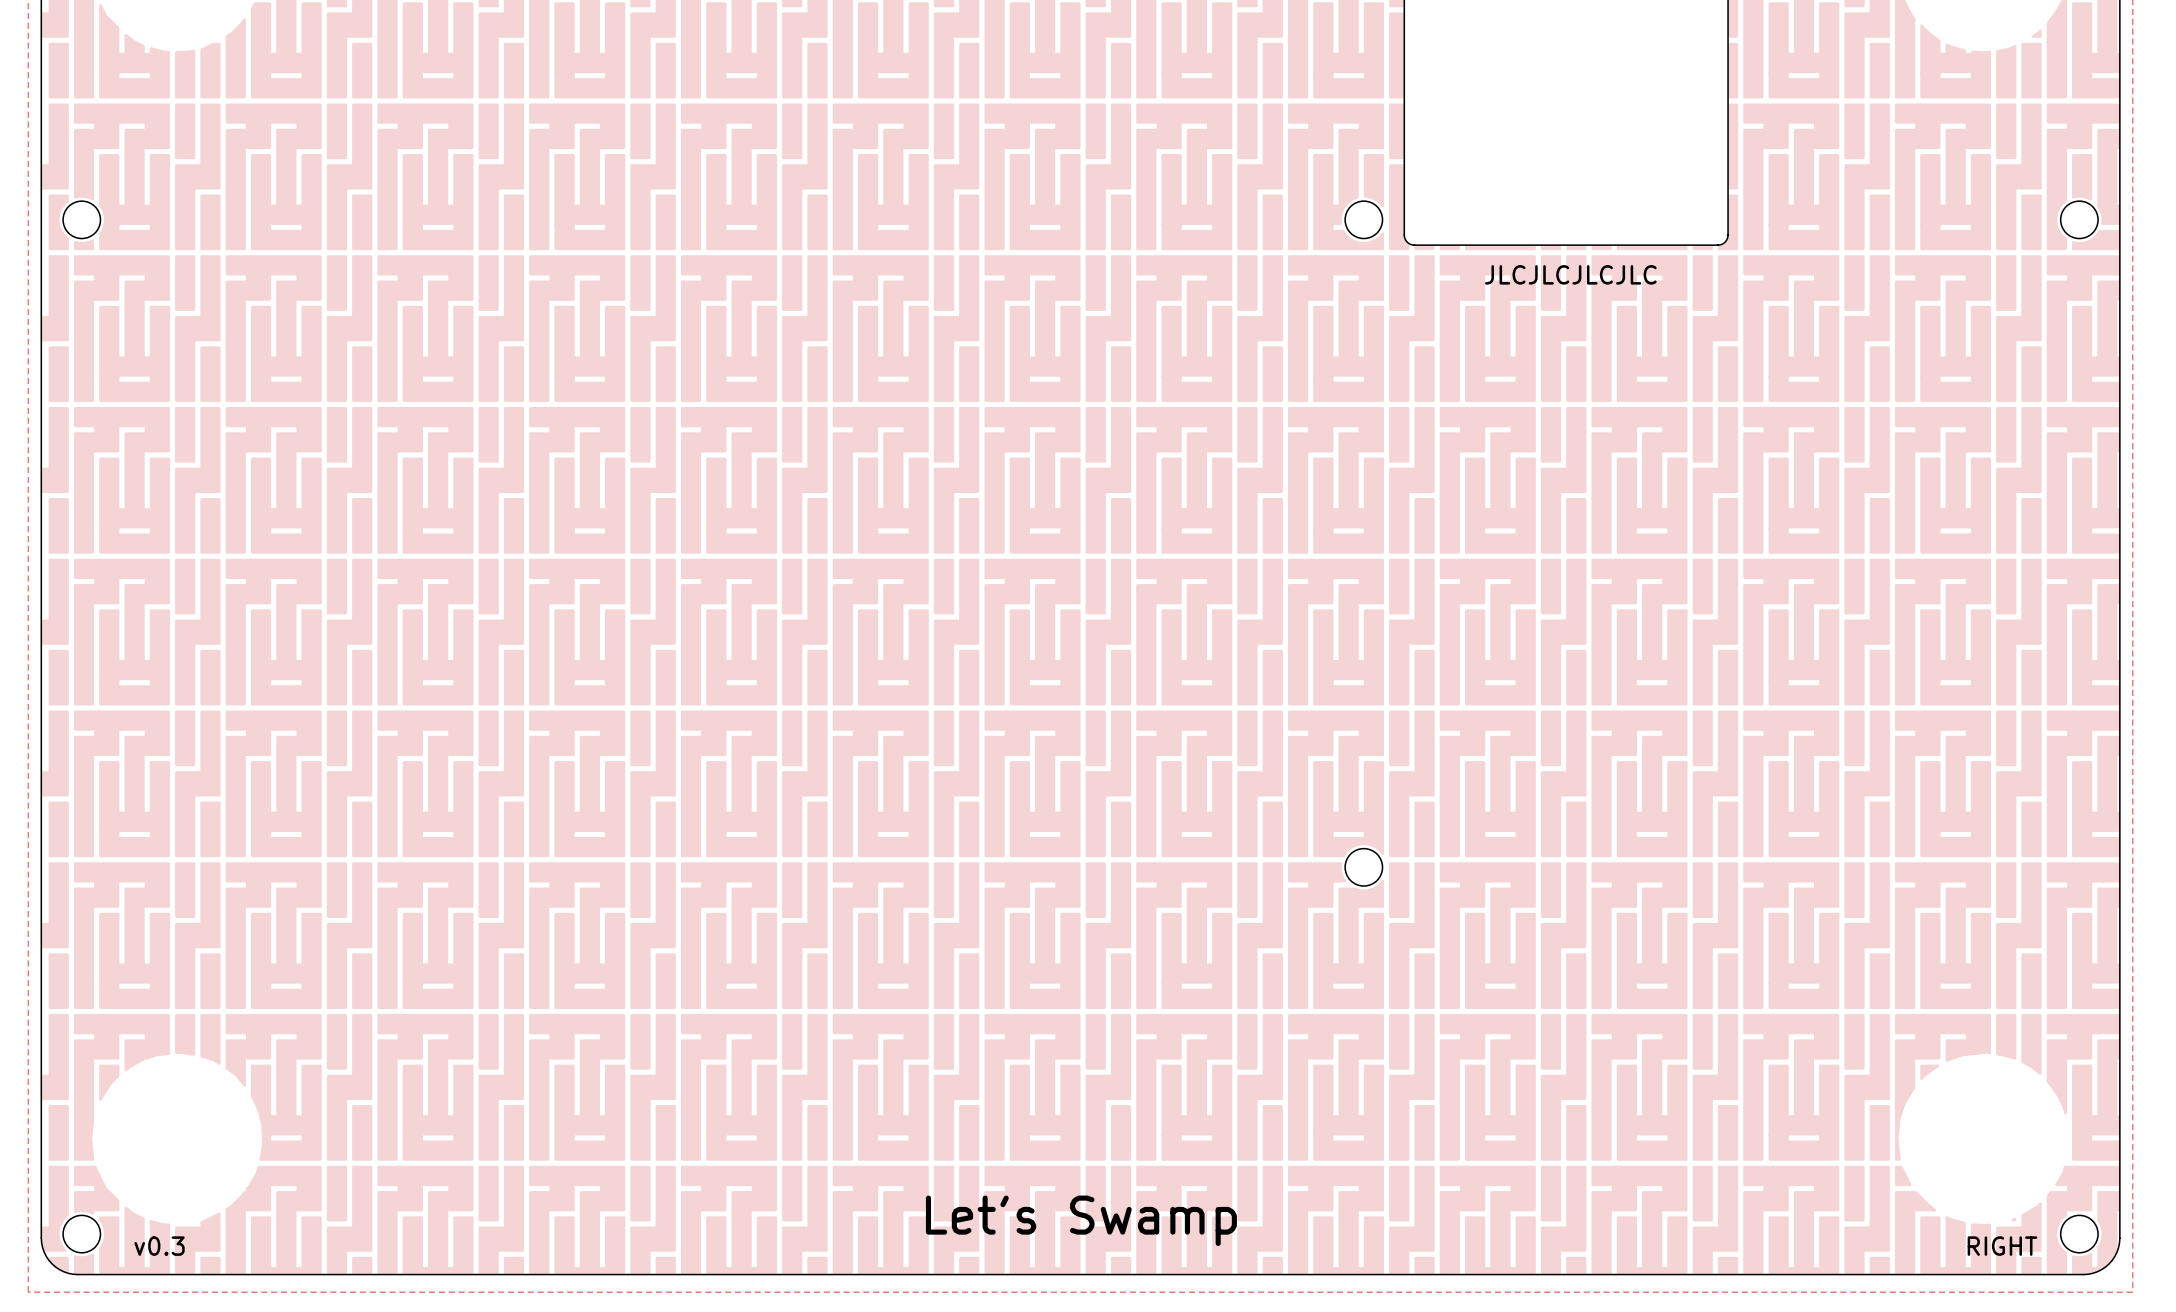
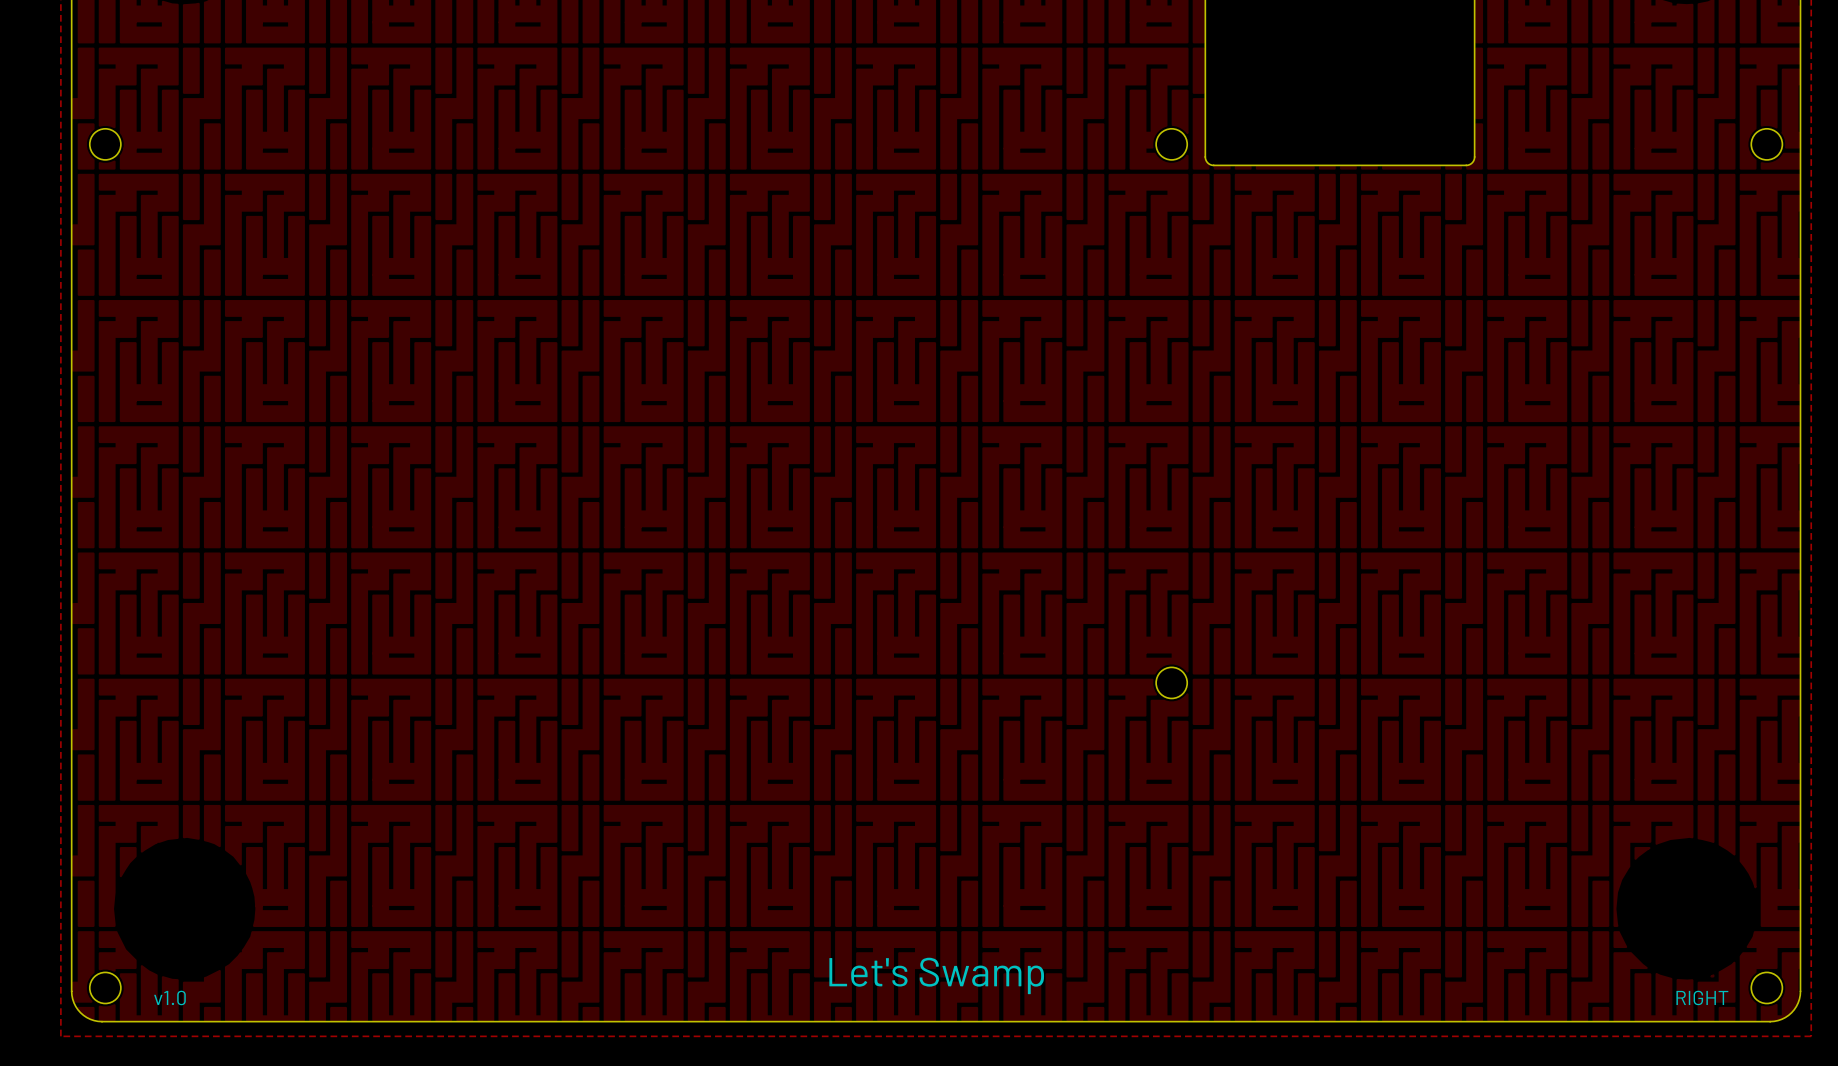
text: JLCJLCJLCJLC (1570, 274) -> none
text: v0.3 (159, 1246) -> v1.0 (169, 997)

